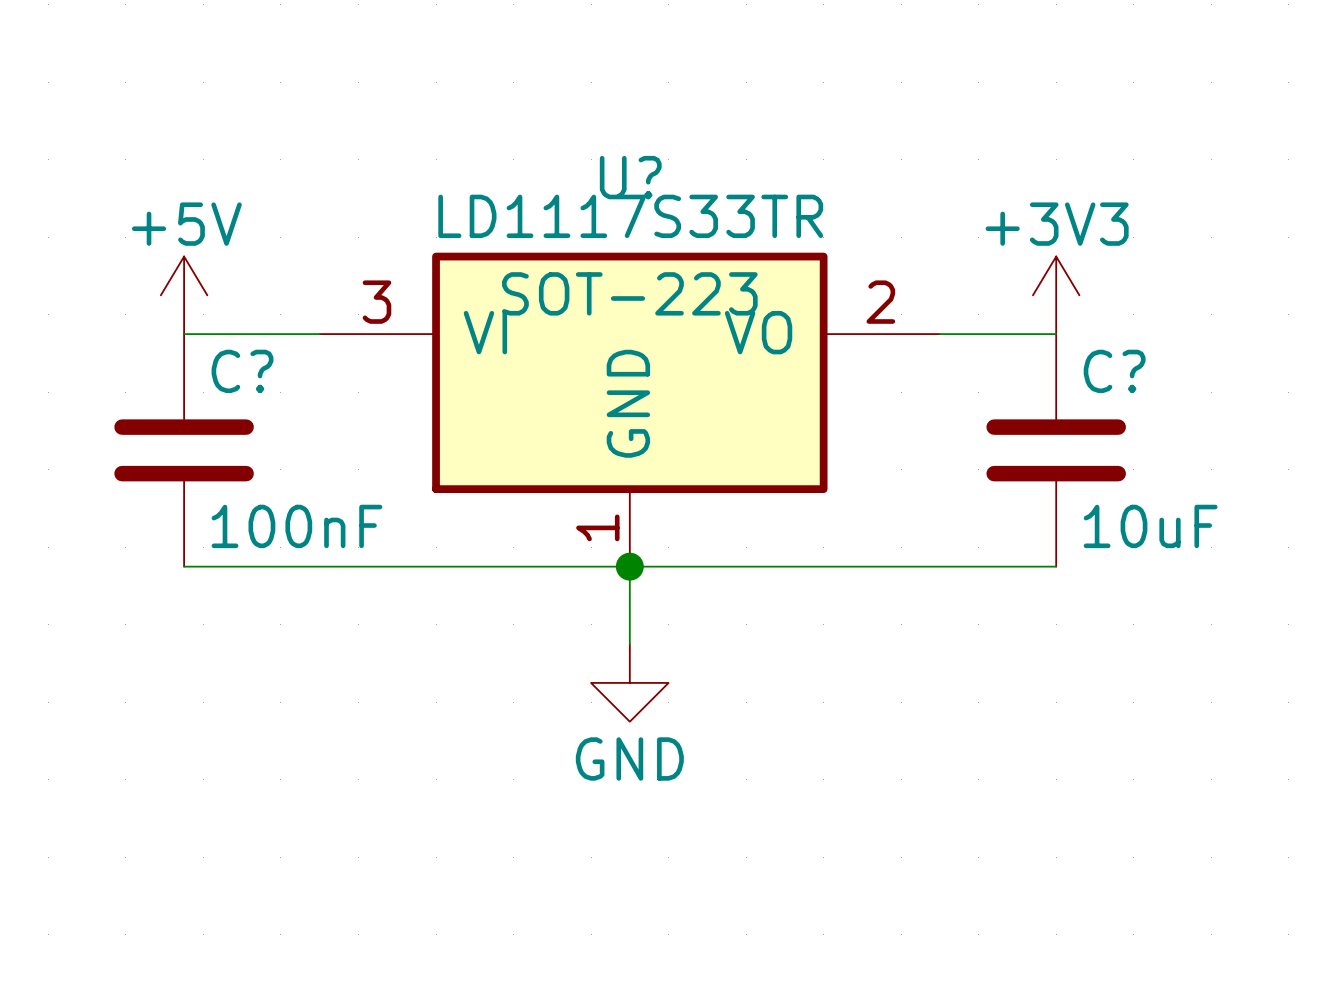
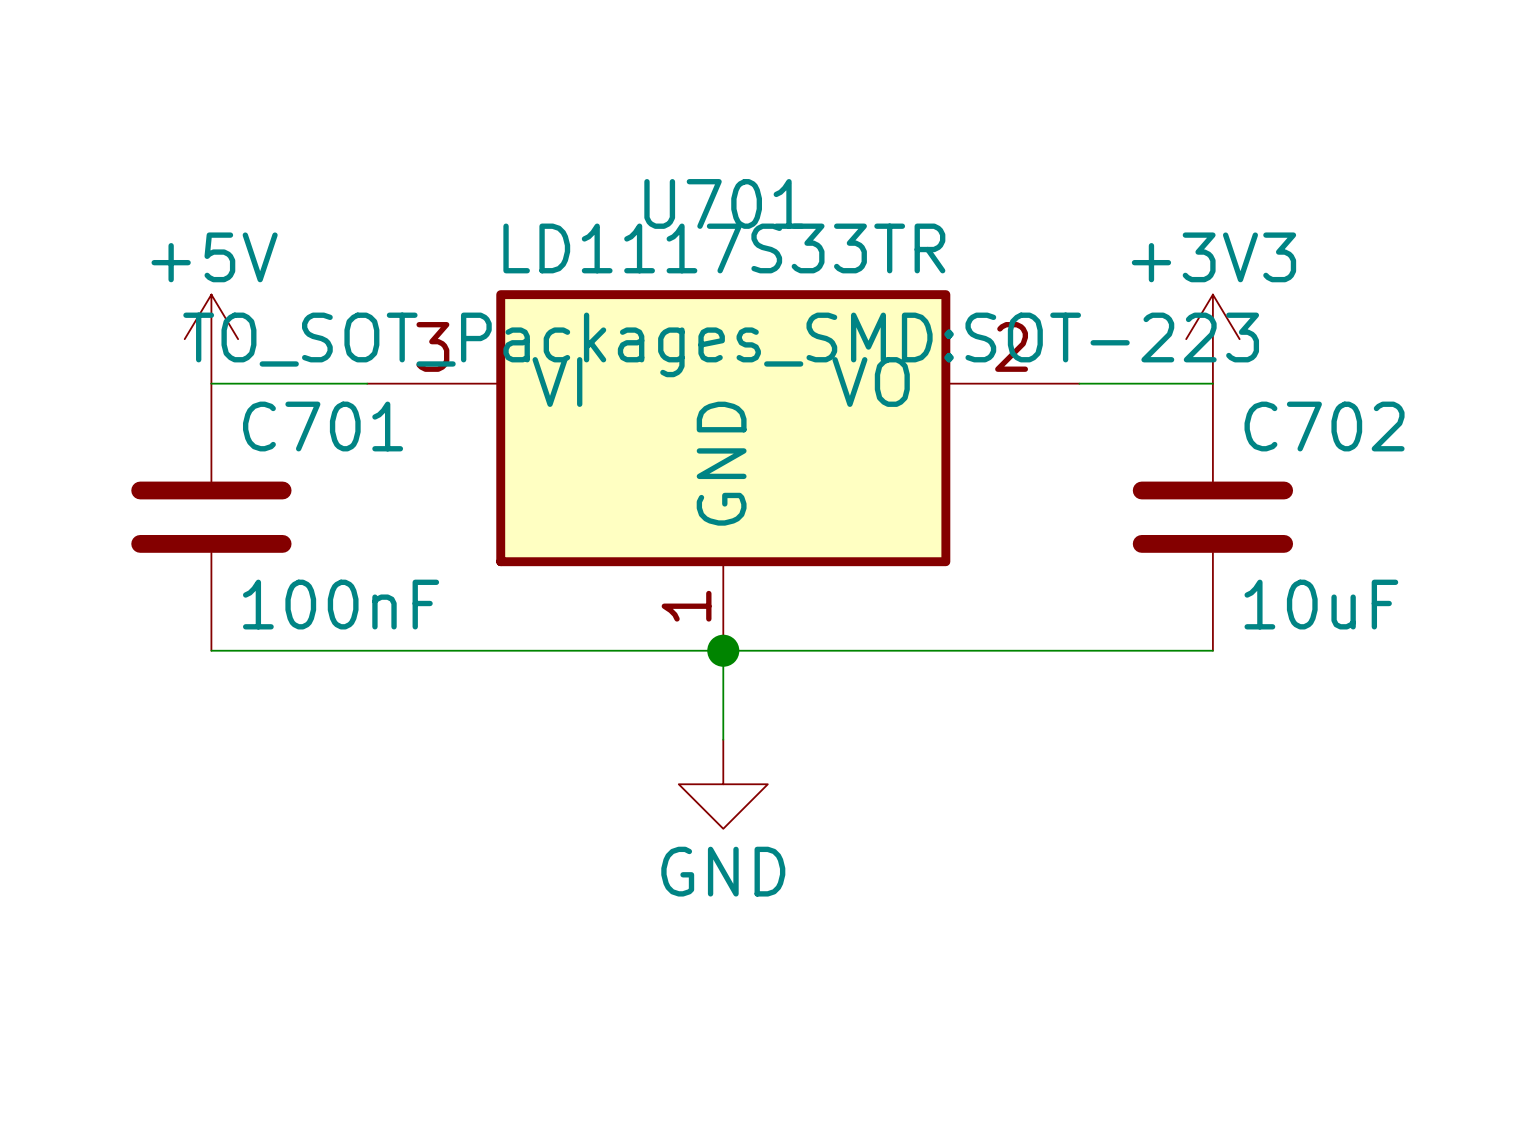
U? name: U? (630, 177) -> U701 (724, 203)
U? text: SOT-223 (629, 293) -> TO_SOT_Packages_SMD:SOT-223 (721, 344)
C? name: C? (242, 371) -> C701 (323, 426)
C? name: C? (1114, 371) -> C702 (1324, 426)

